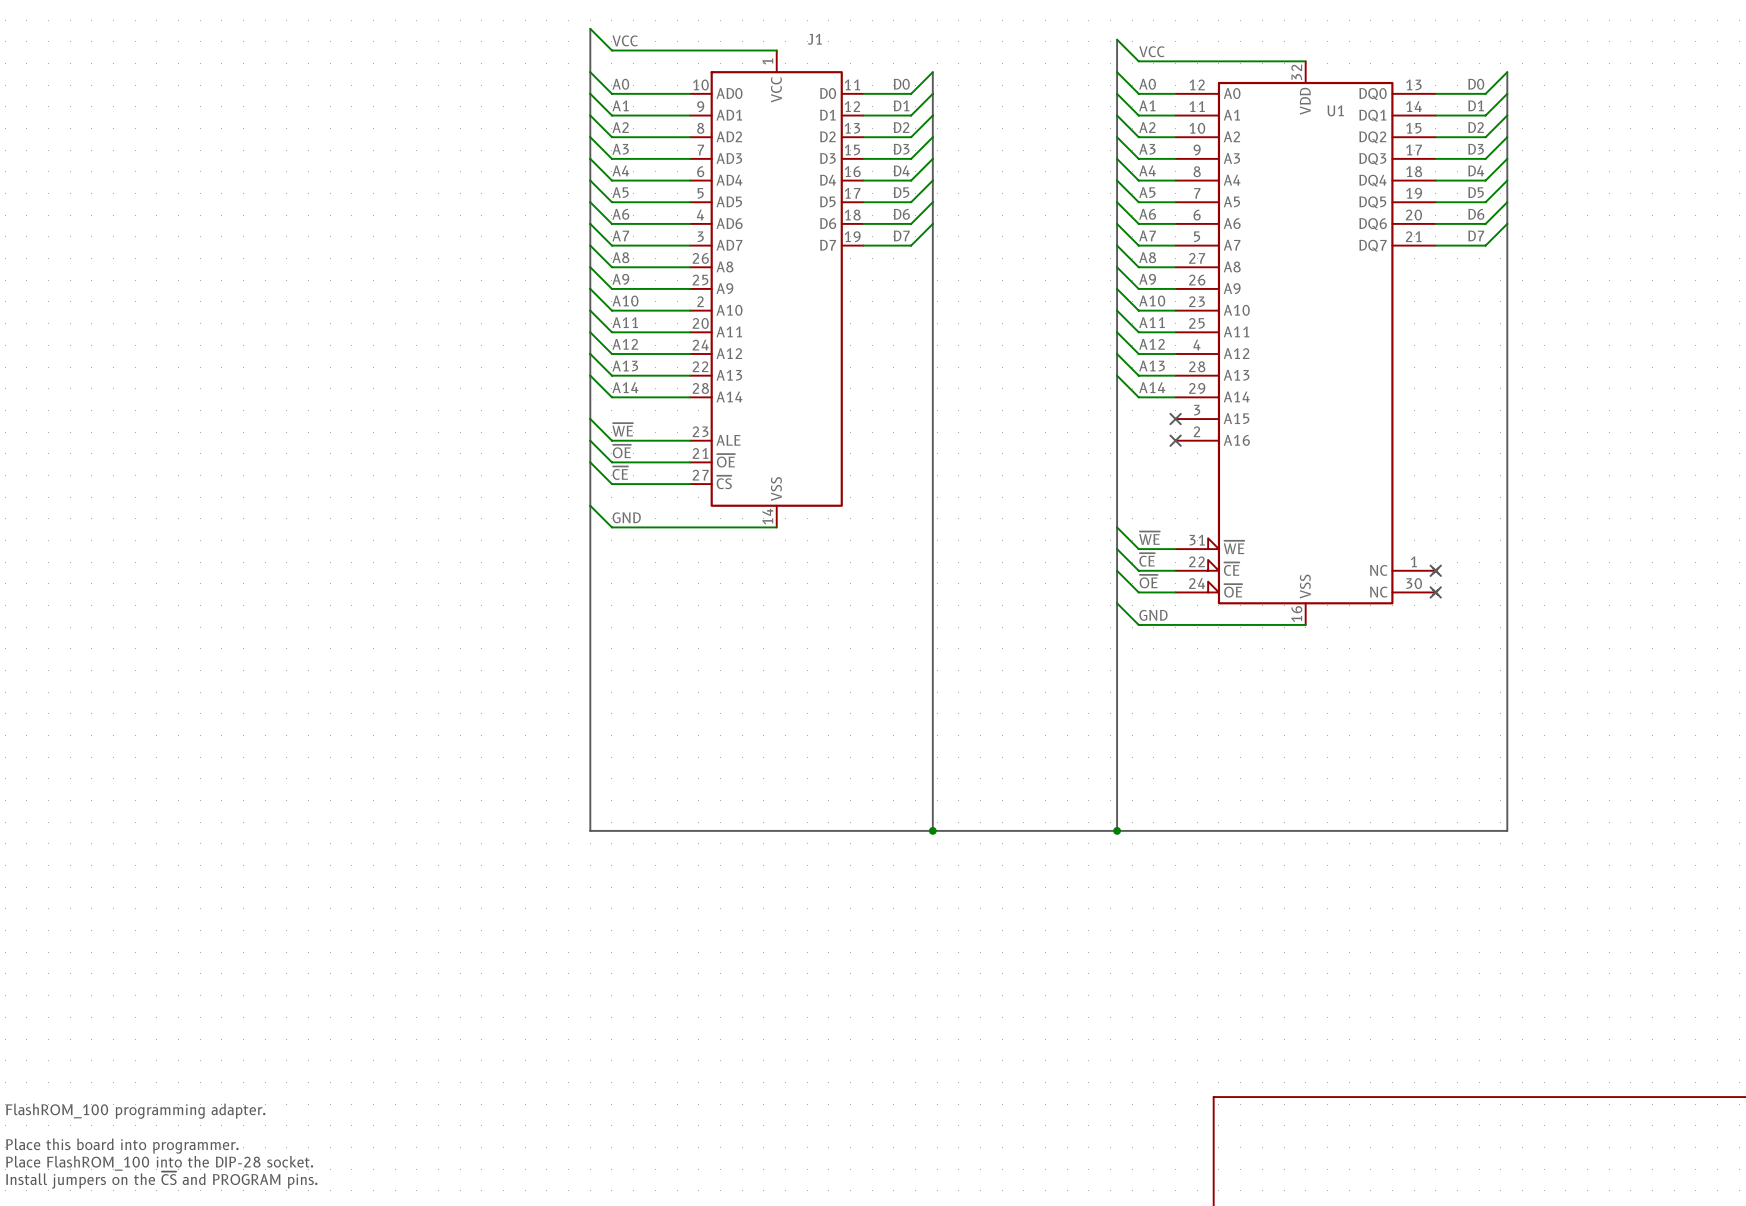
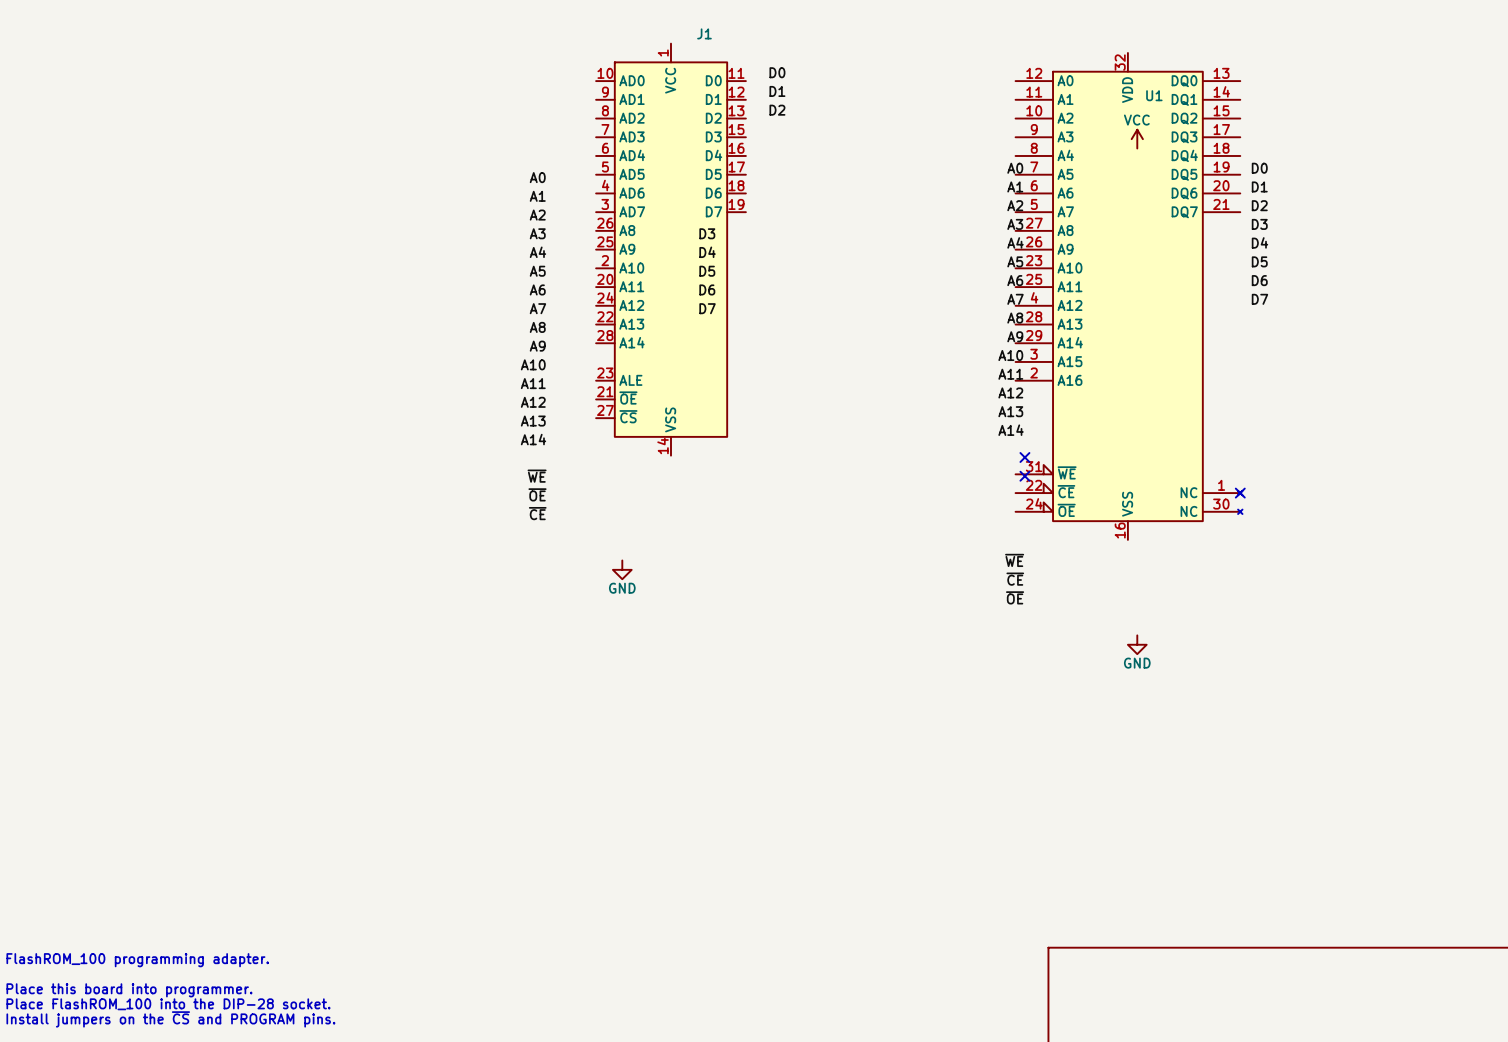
wire: (590, 28) (611, 50) (776, 50) -> none
bus: (590, 28) (590, 830) (1507, 830) (1507, 72) -> none
wire: (1117, 39) (1138, 61) (1305, 61) -> none
bus: (1117, 39) (1117, 830) -> none
label: VCC (625, 40) -> none
label: VCC (1151, 51) -> none
wire: (590, 72) (611, 93) (690, 93) -> none
wire: (932, 72) (911, 93) (863, 93) -> none
bus: (932, 72) (932, 830) -> none
wire: (1117, 72) (1138, 93) (1175, 93) -> none
wire: (1507, 72) (1485, 93) (1435, 93) -> none
label position: A0 (620, 84) -> A0 (537, 177)
label position: A0 (1147, 84) -> A0 (1015, 168)
label position: D0 (1476, 84) -> D0 (1259, 168)
wire: (590, 93) (611, 115) (690, 115) -> none
wire: (932, 93) (911, 115) (863, 115) -> none
wire: (1117, 93) (1138, 115) (1175, 115) -> none
wire: (1507, 93) (1485, 115) (1435, 115) -> none
label position: A1 (620, 105) -> A1 (537, 196)
label position: A1 (1147, 105) -> A1 (1015, 186)
label position: D1 (1476, 105) -> D1 (1259, 186)
wire: (590, 115) (611, 137) (690, 137) -> none
wire: (932, 115) (911, 137) (863, 137) -> none
wire: (1117, 115) (1138, 137) (1175, 137) -> none
wire: (1507, 115) (1485, 137) (1435, 137) -> none
label position: A2 (620, 127) -> A2 (537, 215)
label position: A2 (1147, 127) -> A2 (1015, 205)
label position: D2 (1476, 127) -> D2 (1259, 205)
wire: (590, 137) (611, 158) (690, 158) -> none
wire: (932, 137) (911, 158) (863, 158) -> none
wire: (1117, 137) (1138, 158) (1175, 158) -> none
wire: (1507, 137) (1485, 158) (1435, 158) -> none
label position: A3 (620, 149) -> A3 (537, 233)
label position: D3 (901, 149) -> D3 (707, 233)
label position: A3 (1147, 149) -> A3 (1015, 224)
label position: D3 (1476, 149) -> D3 (1259, 224)
wire: (590, 158) (611, 180) (690, 180) -> none
wire: (932, 158) (911, 180) (863, 180) -> none
wire: (1117, 158) (1138, 180) (1175, 180) -> none
wire: (1507, 158) (1485, 180) (1435, 180) -> none
power symbol: none -> VCC (1137, 139)
label position: A4 (620, 170) -> A4 (537, 252)
label position: D4 (901, 170) -> D4 (707, 252)
label position: A4 (1147, 170) -> A4 (1015, 242)
label position: D4 (1476, 170) -> D4 (1259, 242)
wire: (590, 180) (611, 202) (690, 202) -> none
wire: (932, 180) (911, 202) (863, 202) -> none
wire: (1117, 180) (1138, 202) (1175, 202) -> none
wire: (1507, 180) (1485, 202) (1435, 202) -> none
label position: A5 (620, 192) -> A5 (537, 271)
label position: D5 (901, 192) -> D5 (707, 271)
label position: A5 (1147, 192) -> A5 (1015, 261)
label position: D5 (1476, 192) -> D5 (1259, 261)
wire: (590, 202) (611, 223) (690, 223) -> none
wire: (932, 202) (911, 223) (863, 223) -> none
wire: (1117, 202) (1138, 223) (1175, 223) -> none
wire: (1507, 202) (1485, 223) (1435, 223) -> none
label position: A6 (620, 214) -> A6 (537, 289)
label position: D6 (901, 214) -> D6 (707, 289)
label position: A6 (1147, 214) -> A6 (1015, 280)
label position: D6 (1476, 214) -> D6 (1259, 280)
wire: (590, 223) (611, 245) (690, 245) -> none
wire: (932, 223) (911, 245) (863, 245) -> none
wire: (1117, 223) (1138, 245) (1175, 245) -> none
wire: (1507, 223) (1485, 245) (1435, 245) -> none
label position: A7 (620, 235) -> A7 (537, 308)
label position: D7 (901, 235) -> D7 (707, 308)
label position: A7 (1147, 235) -> A7 (1015, 299)
label position: D7 (1476, 235) -> D7 (1259, 299)
wire: (590, 245) (611, 267) (690, 267) -> none
wire: (1117, 245) (1138, 267) (1175, 267) -> none
label position: A8 (620, 257) -> A8 (537, 327)
label position: A8 (1147, 257) -> A8 (1015, 318)
wire: (590, 267) (611, 288) (690, 288) -> none
wire: (1117, 267) (1138, 288) (1175, 288) -> none
label position: A9 (620, 279) -> A9 (537, 346)
label position: A9 (1147, 279) -> A9 (1015, 336)
wire: (590, 288) (611, 310) (690, 310) -> none
wire: (1117, 288) (1138, 310) (1175, 310) -> none
label position: A10 (625, 301) -> A10 (533, 364)
label position: A10 (1152, 301) -> A10 (1010, 355)
wire: (590, 310) (611, 332) (690, 332) -> none
wire: (1117, 310) (1138, 332) (1175, 332) -> none
label position: A11 (625, 322) -> A11 (533, 383)
label position: A11 (1151, 322) -> A11 (1010, 374)
wire: (590, 332) (611, 353) (690, 353) -> none
wire: (1117, 332) (1138, 353) (1175, 353) -> none
label position: A12 (625, 344) -> A12 (533, 402)
label position: A12 (1152, 344) -> A12 (1010, 392)
wire: (590, 353) (611, 375) (690, 375) -> none
wire: (1117, 353) (1138, 375) (1175, 375) -> none
label position: A13 (625, 366) -> A13 (533, 421)
label position: A13 (1152, 366) -> A13 (1010, 411)
wire: (590, 375) (611, 397) (690, 397) -> none
wire: (1117, 375) (1138, 397) (1175, 397) -> none
label position: A14 (625, 387) -> A14 (533, 439)
label position: A14 (1152, 387) -> A14 (1011, 430)
wire: (590, 419) (611, 440) (690, 440) -> none
no-connect mark: (1175, 419) -> none
label position: ~{WE} (622, 429) -> ~{WE} (537, 476)
wire: (590, 440) (611, 462) (690, 462) -> none
no-connect mark: (1175, 440) -> none
label position: ~{OE} (621, 451) -> ~{OE} (537, 494)
wire: (590, 462) (611, 484) (690, 484) -> none
label position: ~{CE} (620, 473) -> ~{CE} (537, 513)
wire: (590, 505) (611, 527) (776, 527) -> none
label: GND (626, 517) -> none
wire: (1117, 527) (1138, 549) (1175, 549) -> none
no-connect mark: none -> (1024, 457)
label position: ~{WE} (1149, 538) -> ~{WE} (1014, 560)
wire: (1117, 549) (1138, 570) (1175, 570) -> none
no-connect mark: none -> (1024, 476)
label position: ~{CE} (1147, 559) -> ~{CE} (1015, 579)
wire: (1117, 570) (1138, 592) (1175, 592) -> none
label position: ~{OE} (1148, 581) -> ~{OE} (1015, 597)
no-connect mark: (1435, 592) -> none
wire: (1117, 603) (1138, 624) (1305, 624) -> none
label: GND (1153, 615) -> none
power symbol: none -> GND (622, 569)
power symbol: none -> GND (1137, 644)
junction: (932, 830) -> none
junction: (1117, 830) -> none

